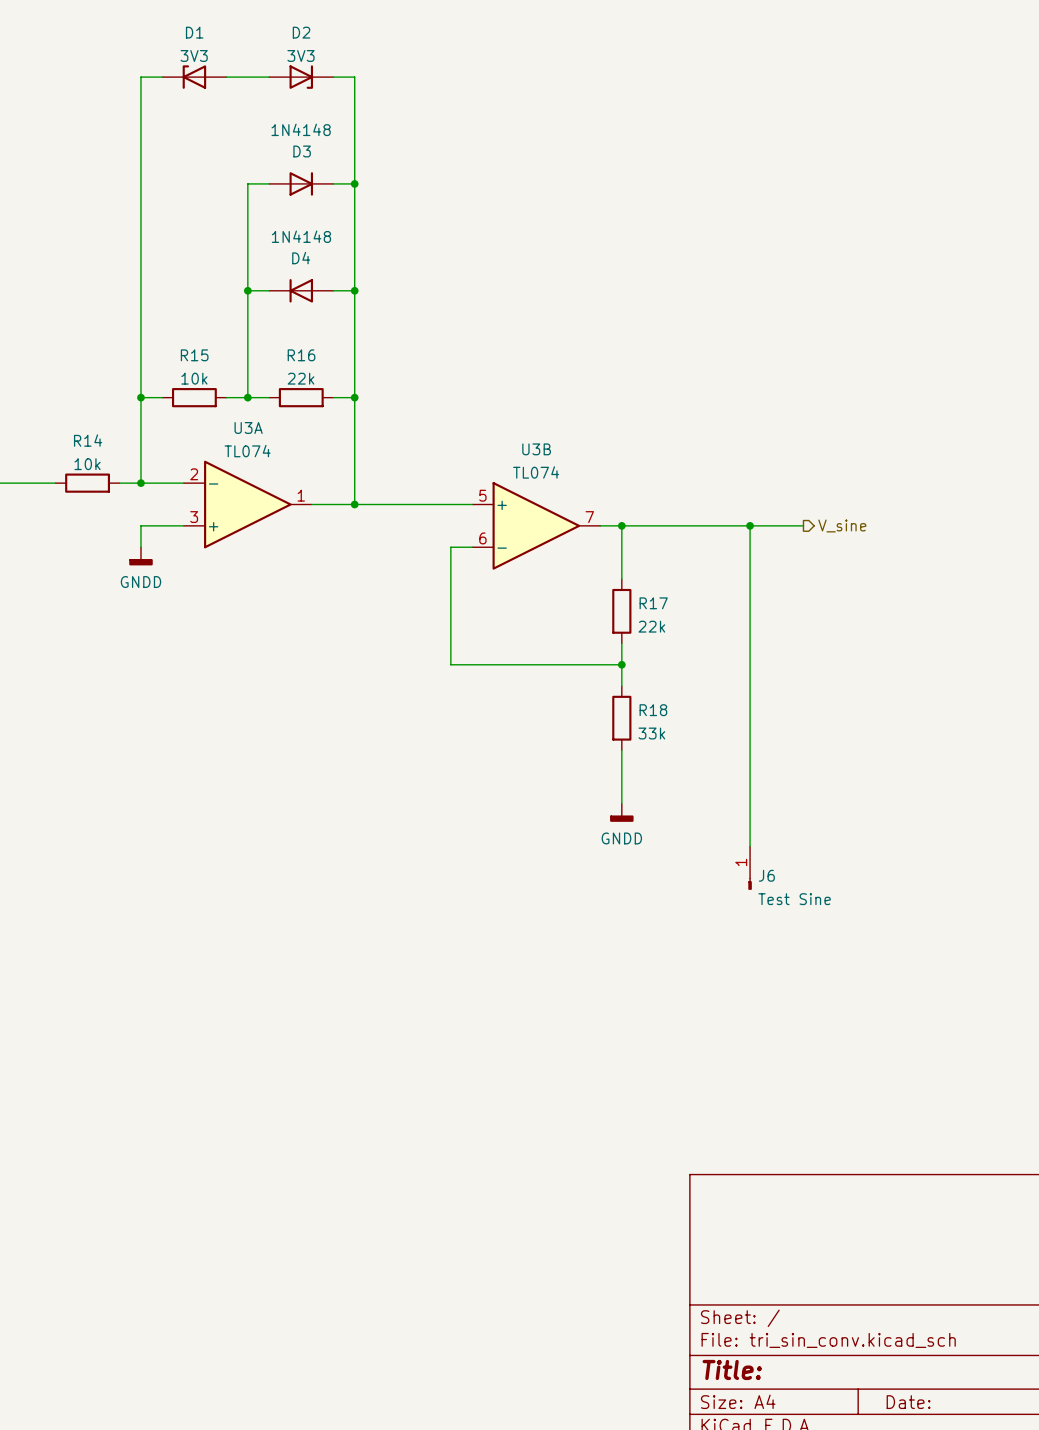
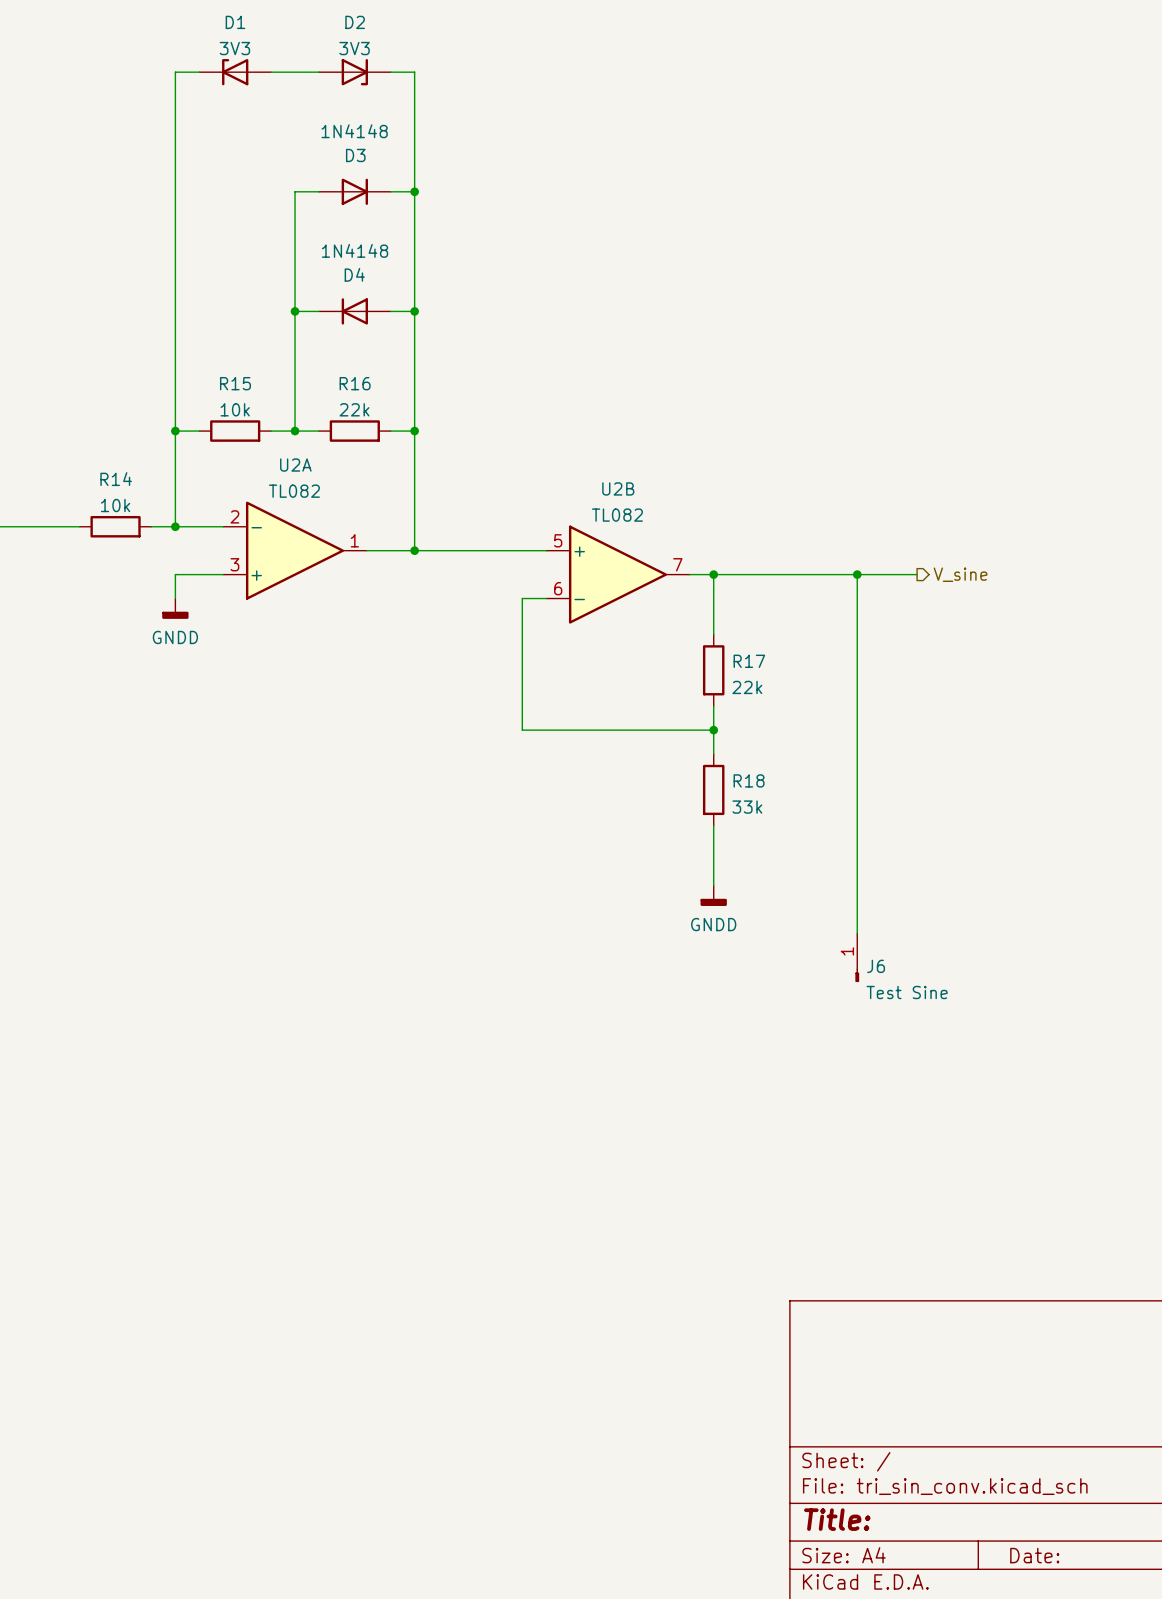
U3A name: U3A (248, 427) -> U2A (295, 465)
U3B name: U3B (536, 449) -> U2B (618, 488)
U3A value: TL074 (247, 451) -> TL082 (294, 491)
U3B value: TL074 (536, 472) -> TL082 (617, 515)

